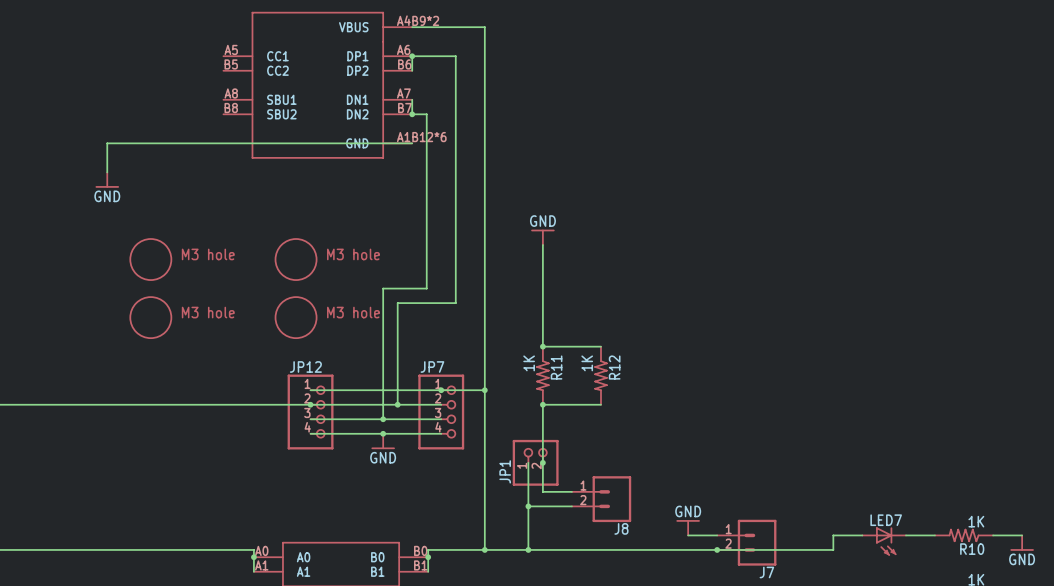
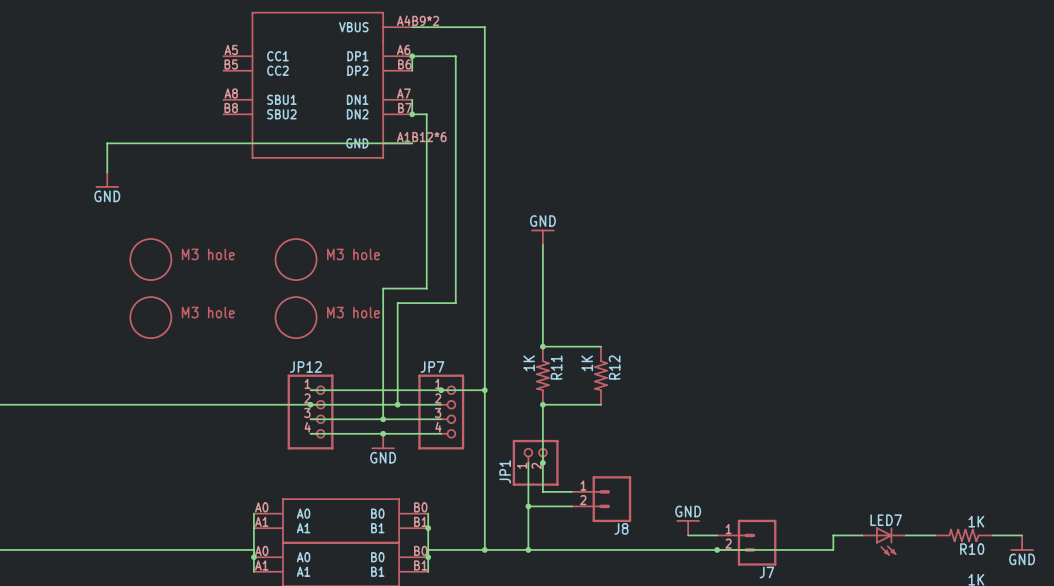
wire: none -> (253, 513) (253, 549)
wire: none -> (428, 513) (428, 549)
part: none -> (341, 520)
junction: none -> (428, 528)

